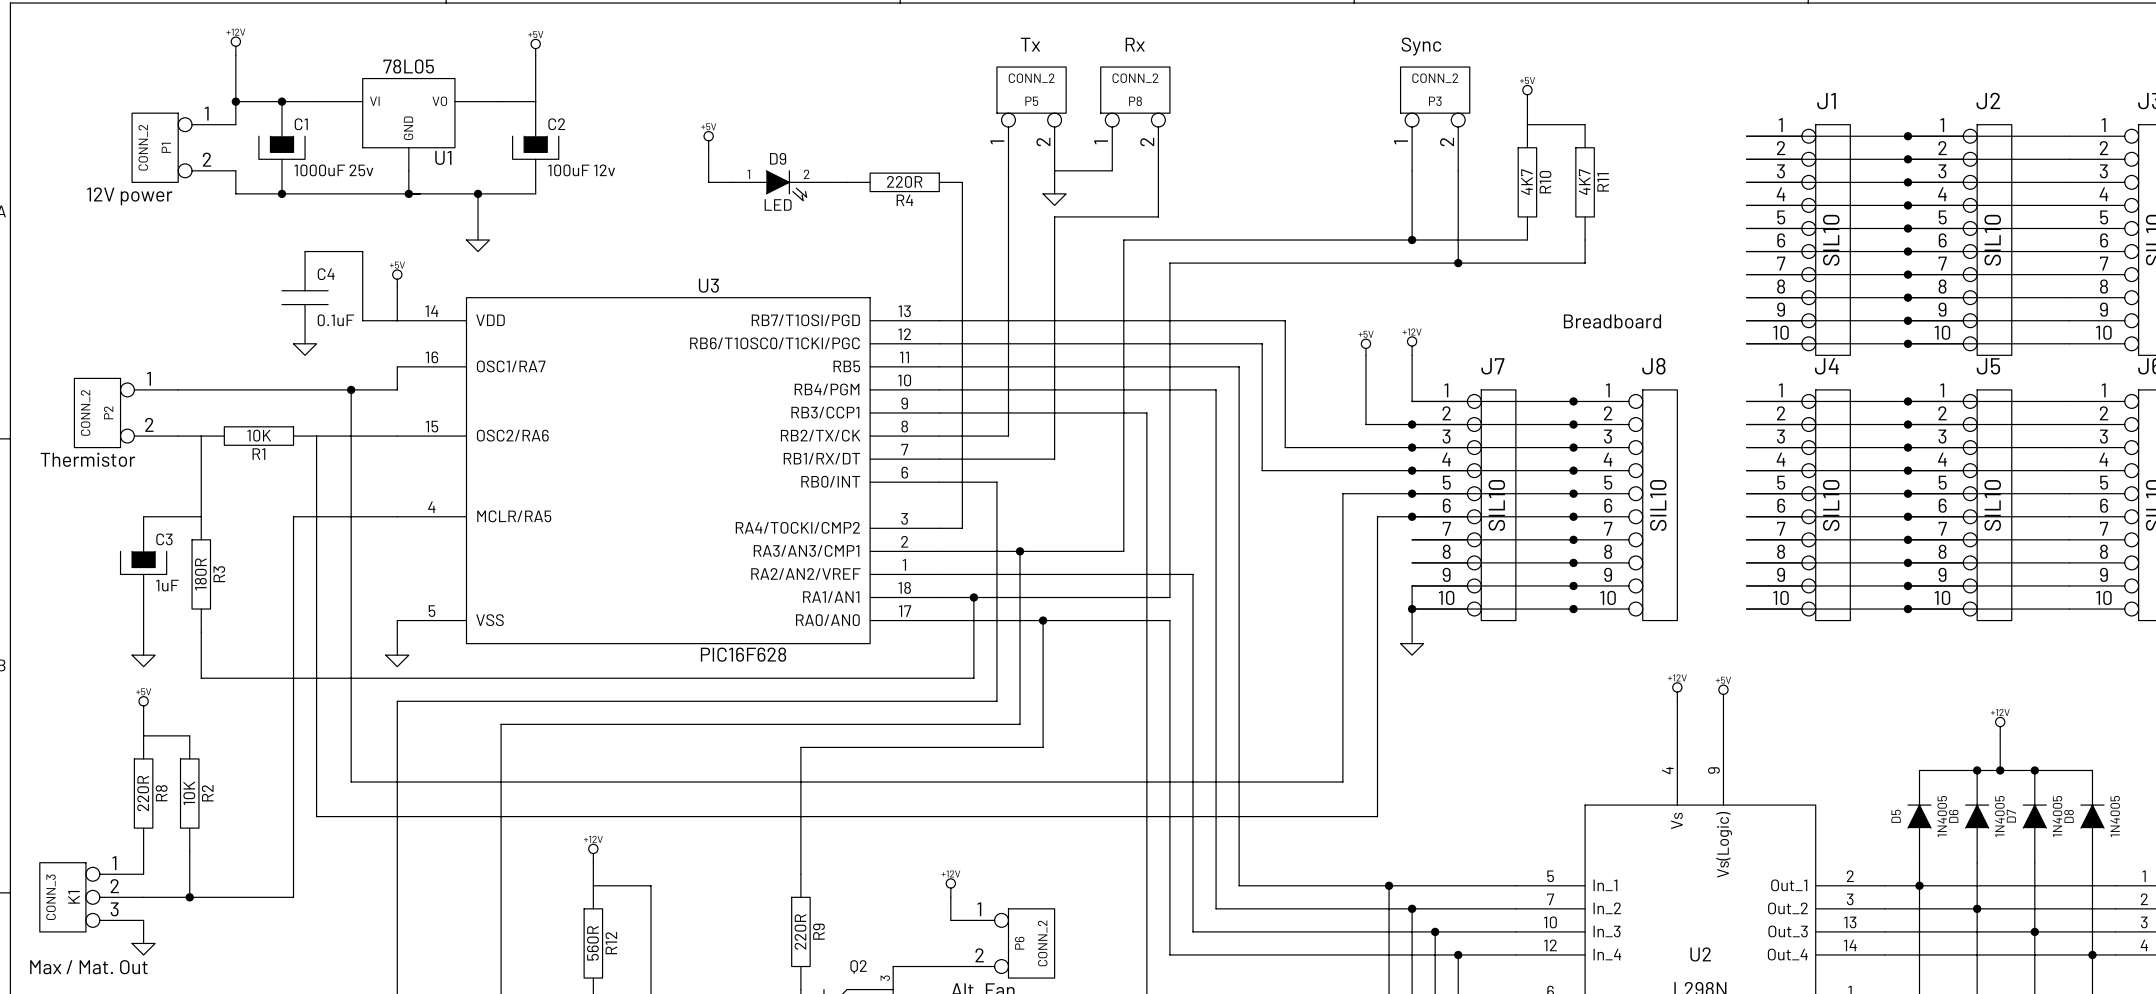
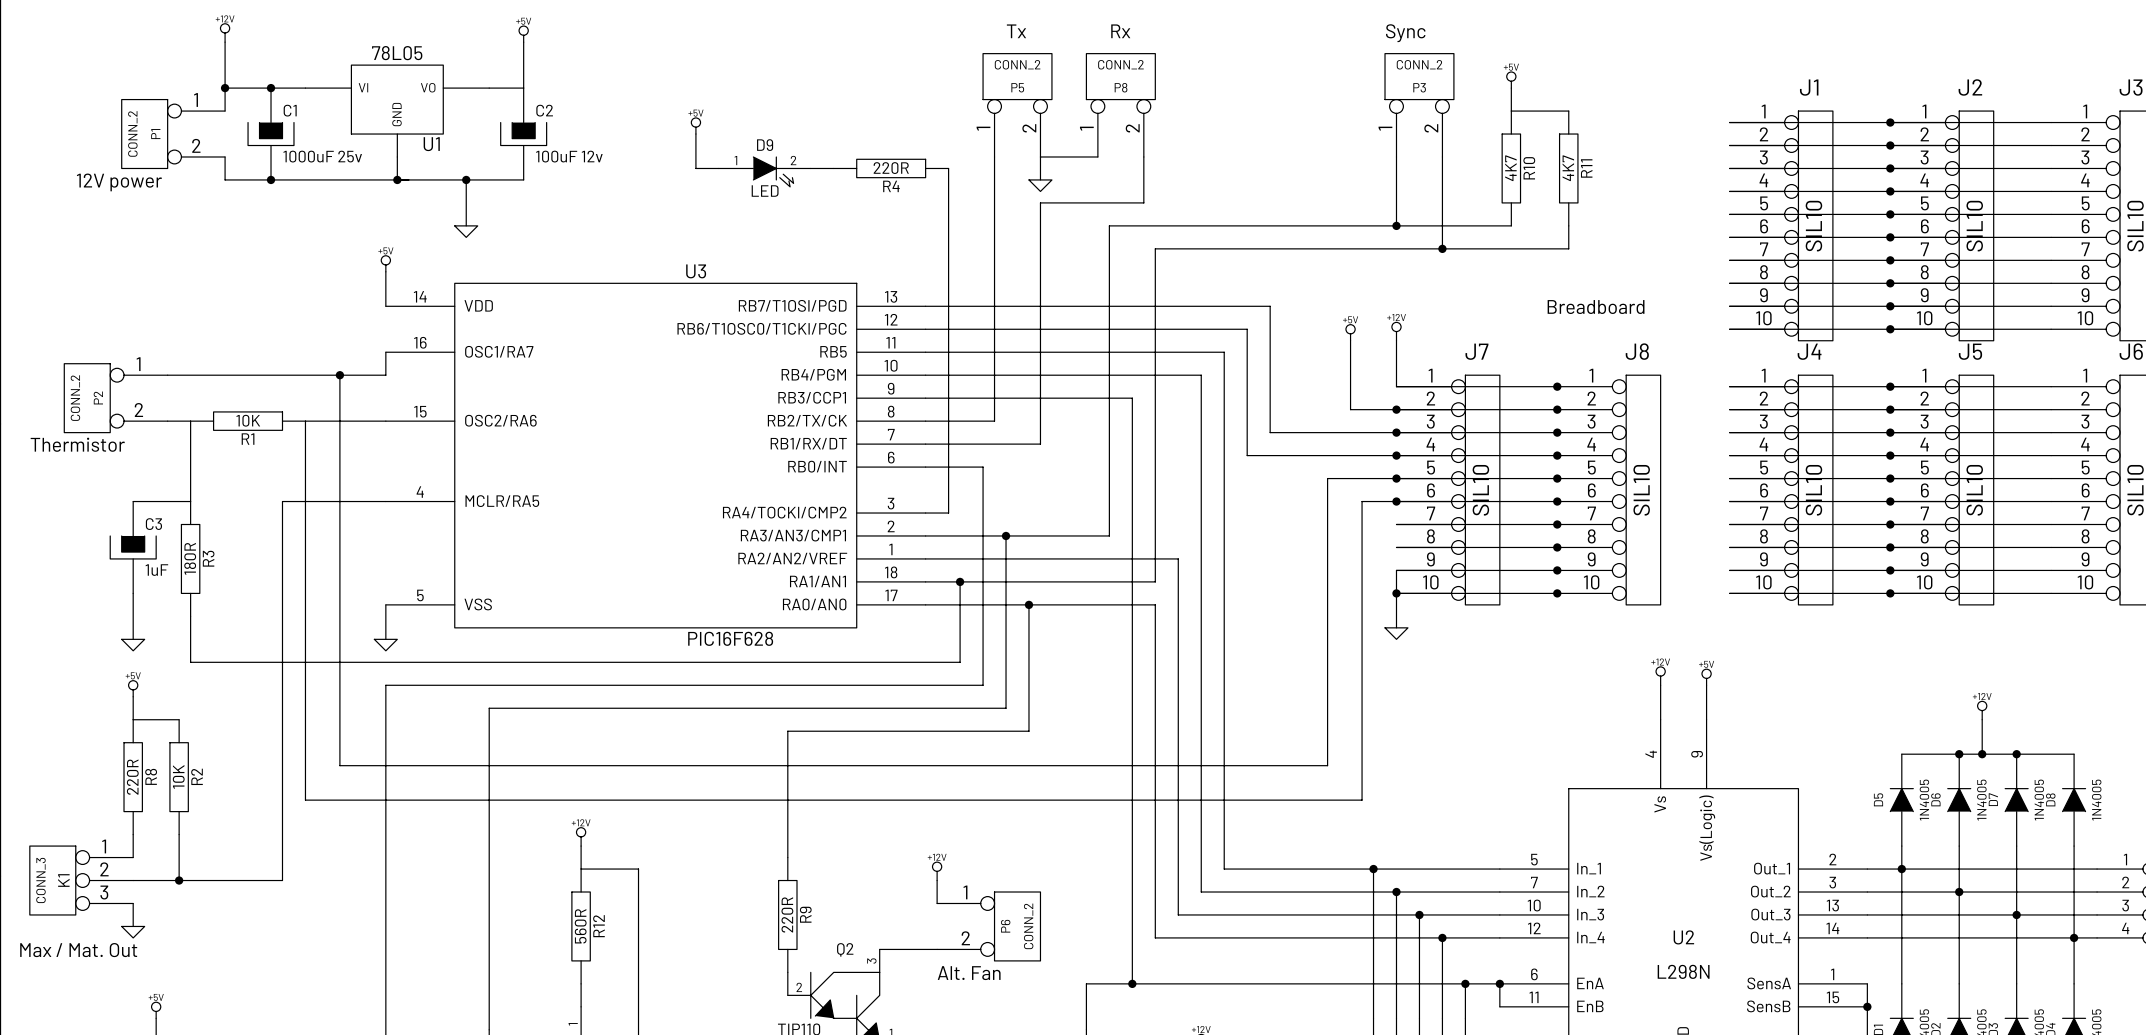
wire: (305, 251) (362, 251) (362, 320) (397, 320) -> none
C4: 0.1uF (305, 297) -> none
power symbol: (305, 349) -> none

